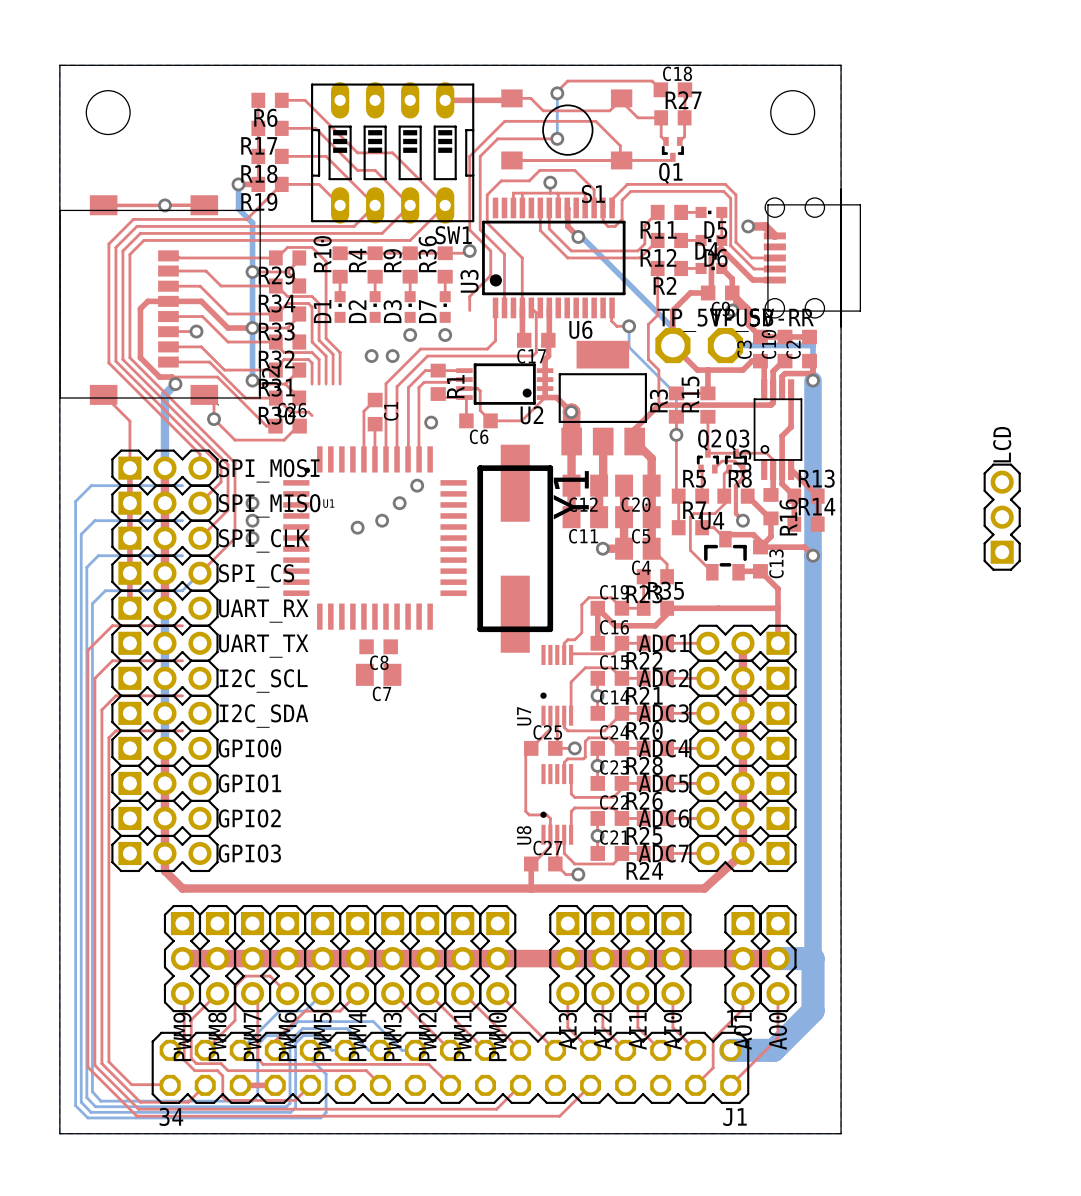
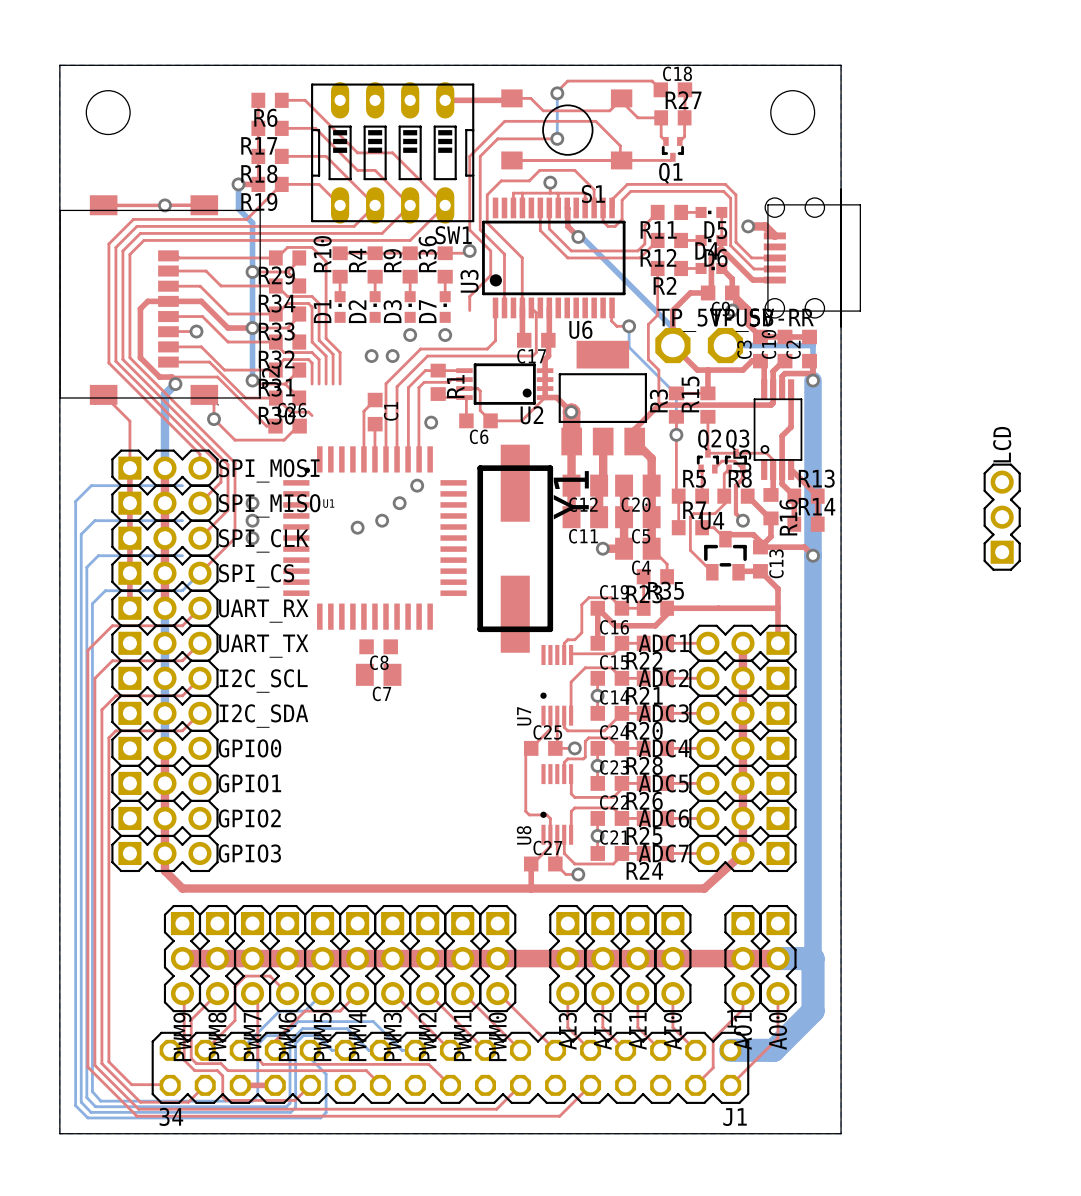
top track: none -> (199, 608) (182, 625)
top track: none -> (199, 643) (182, 660)
top track: none -> (199, 678) (182, 695)
top track: none -> (199, 713) (182, 730)

